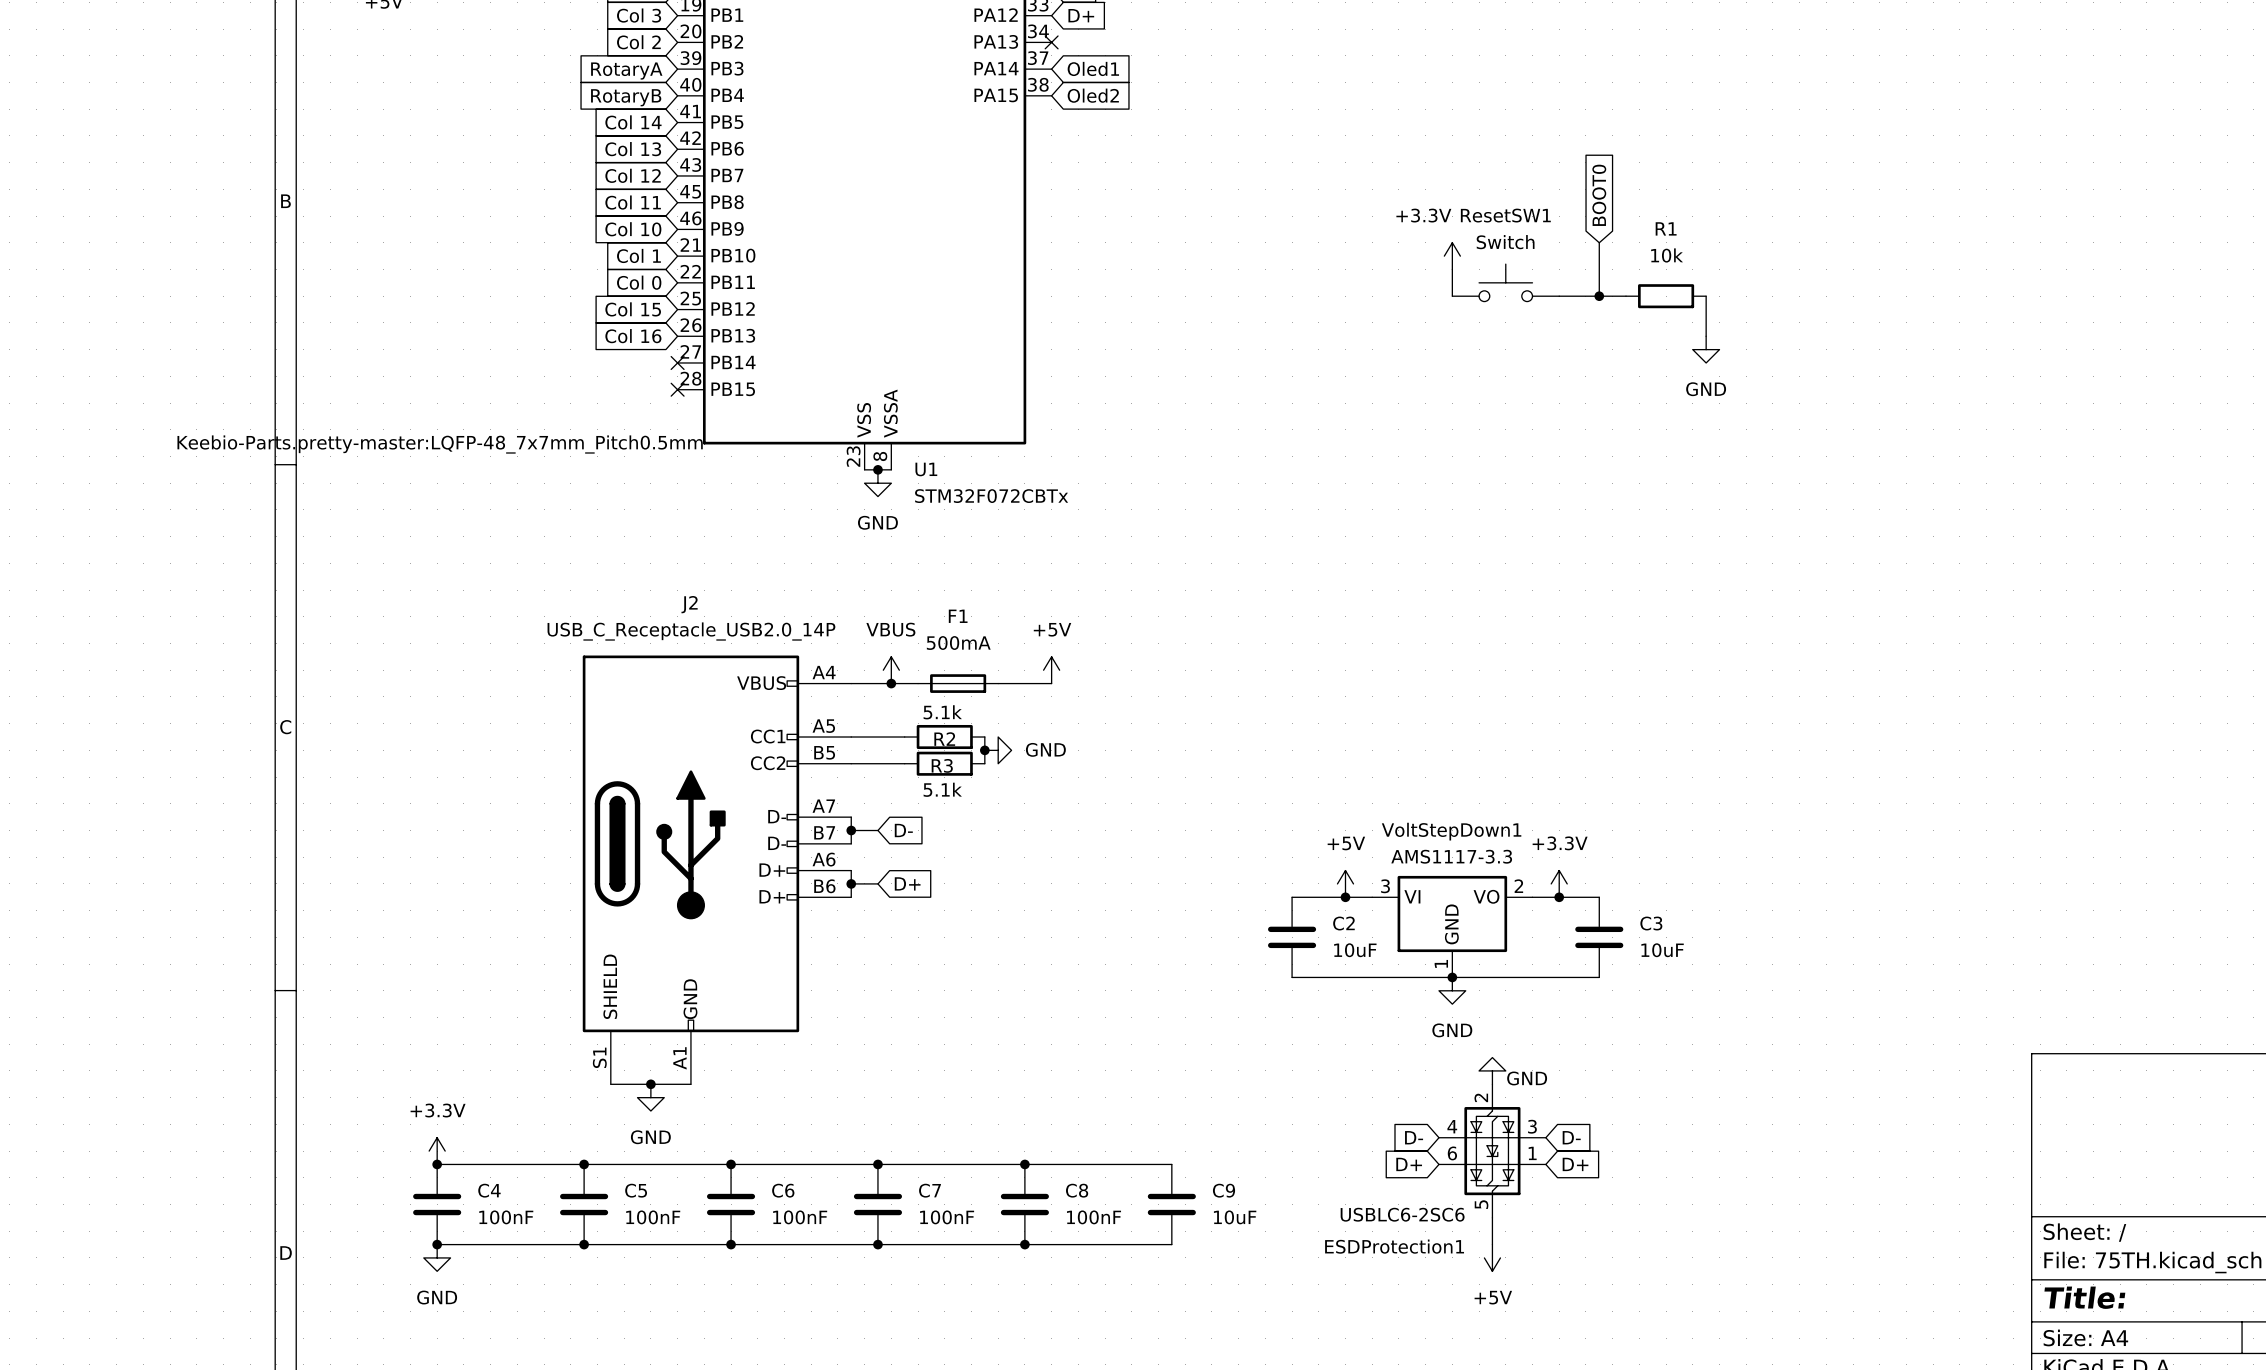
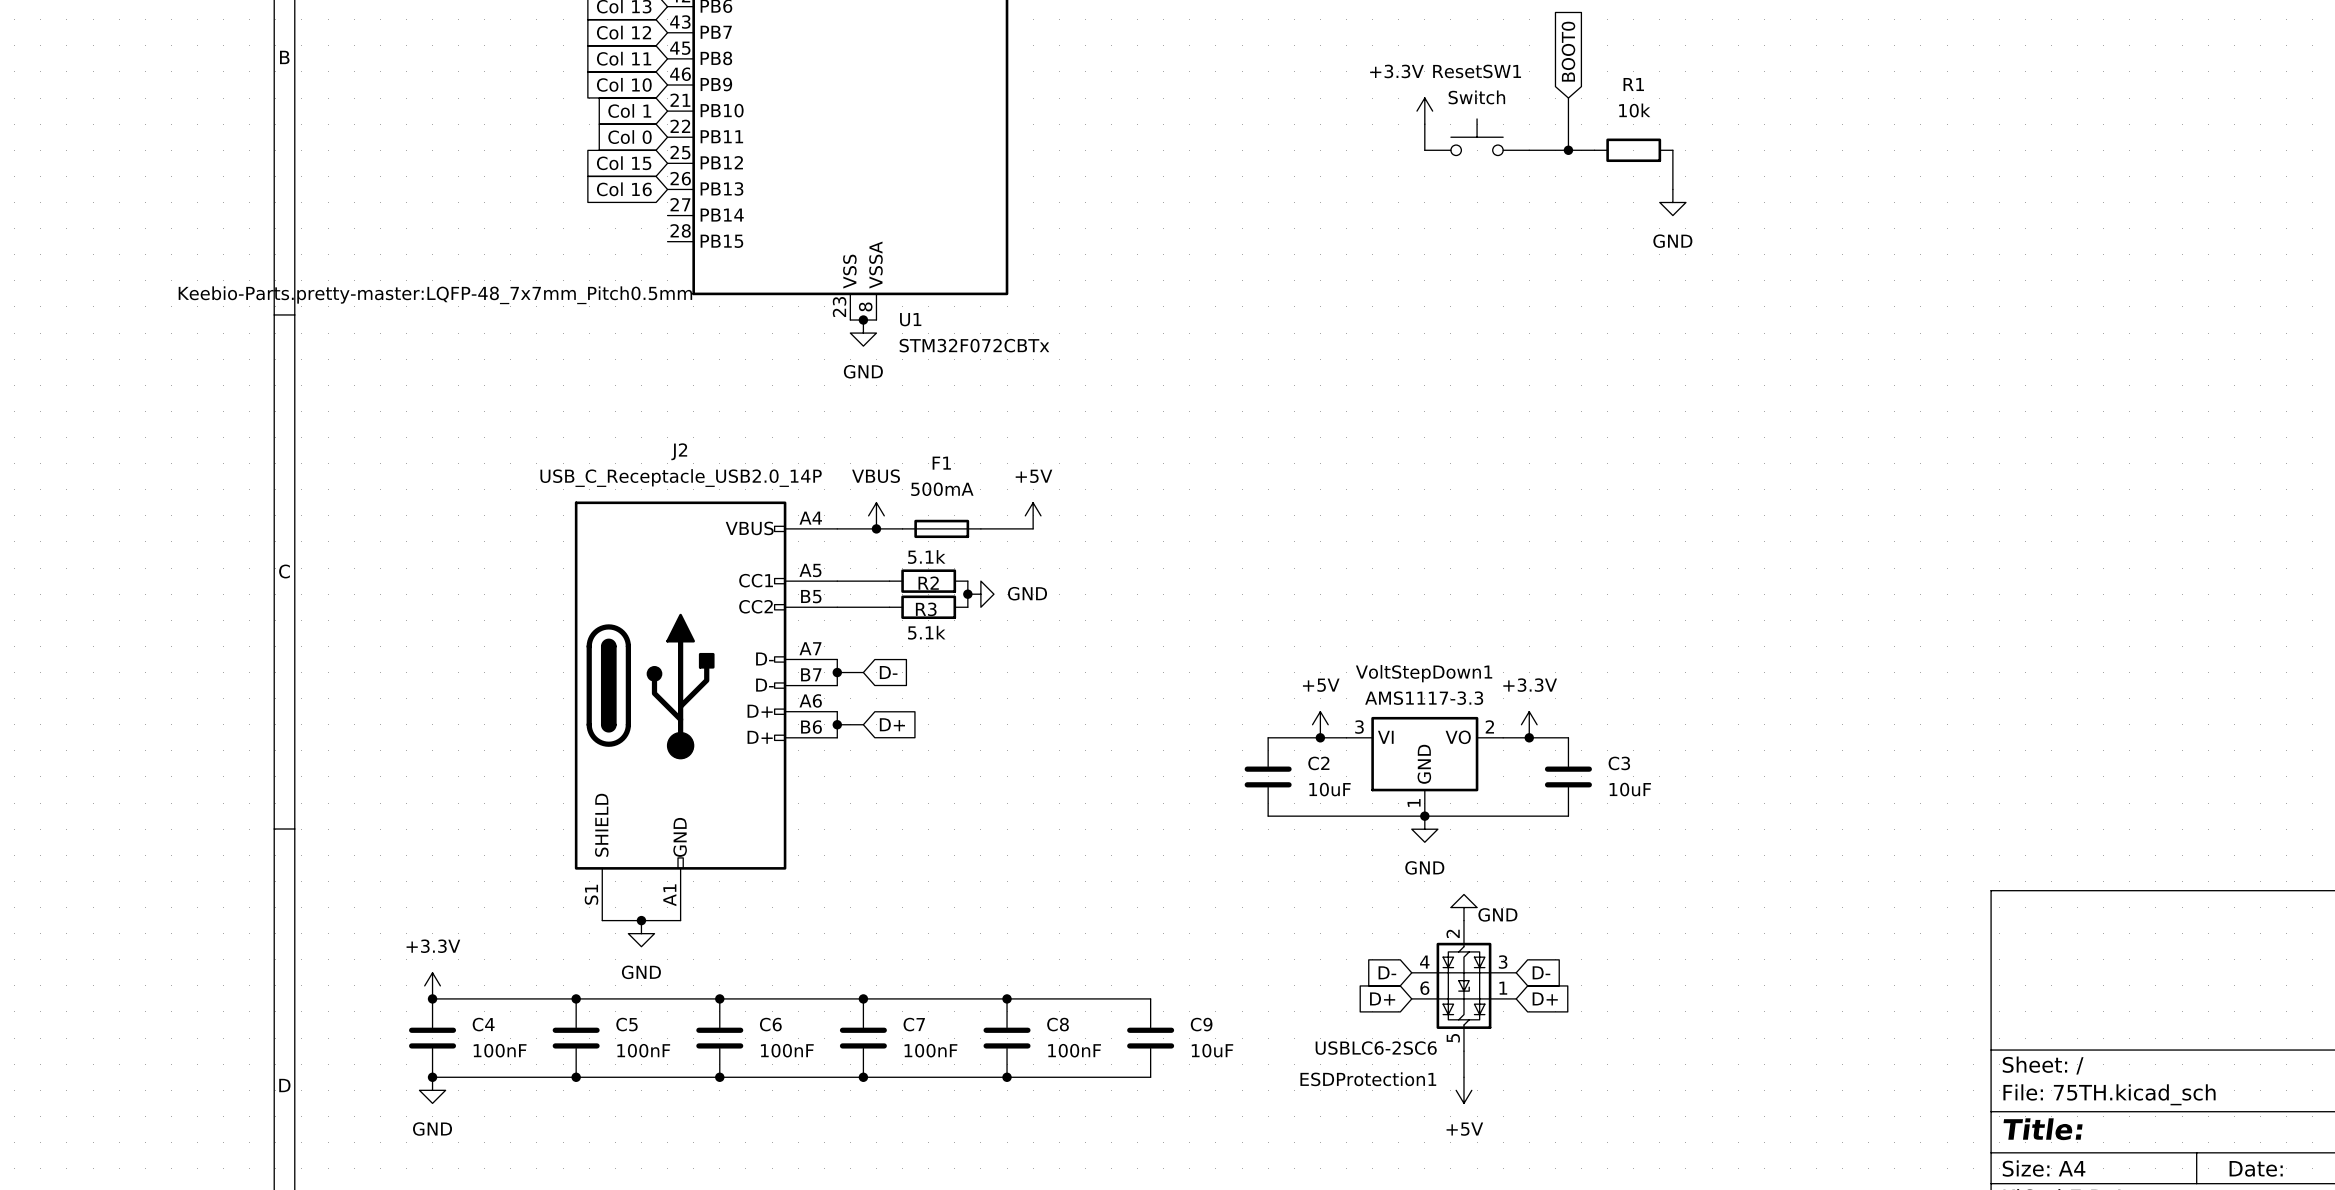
no-connect mark: (677, 362) -> none
no-connect mark: (677, 389) -> none

